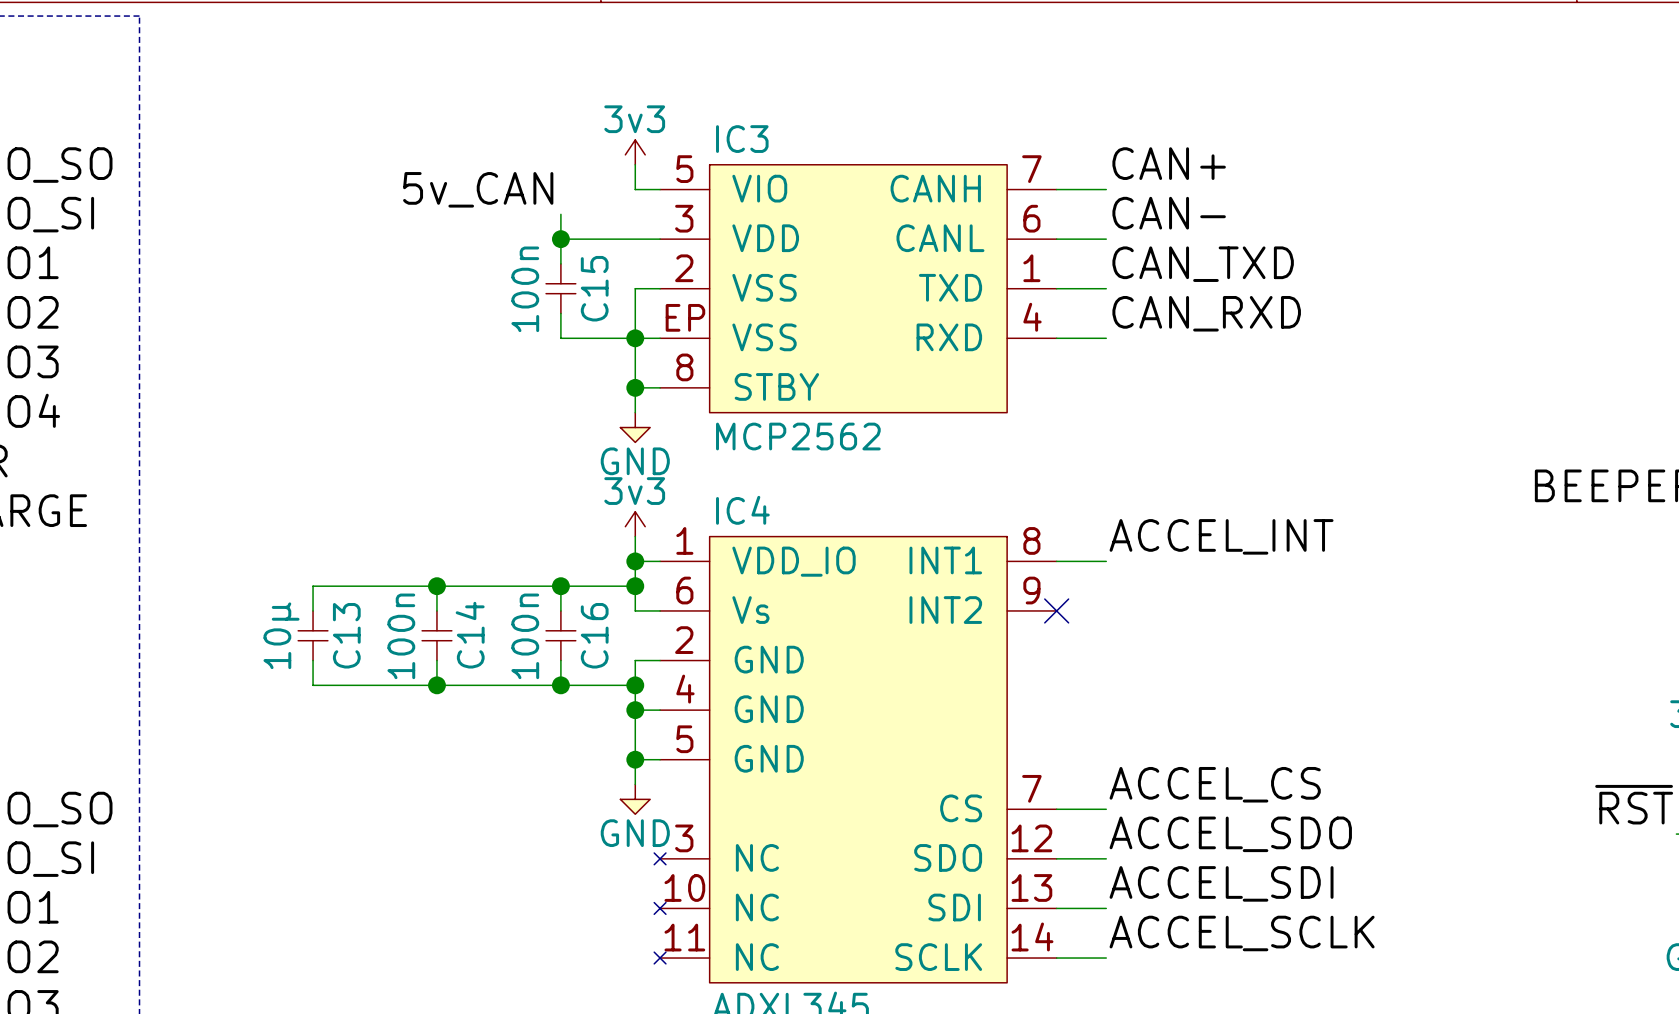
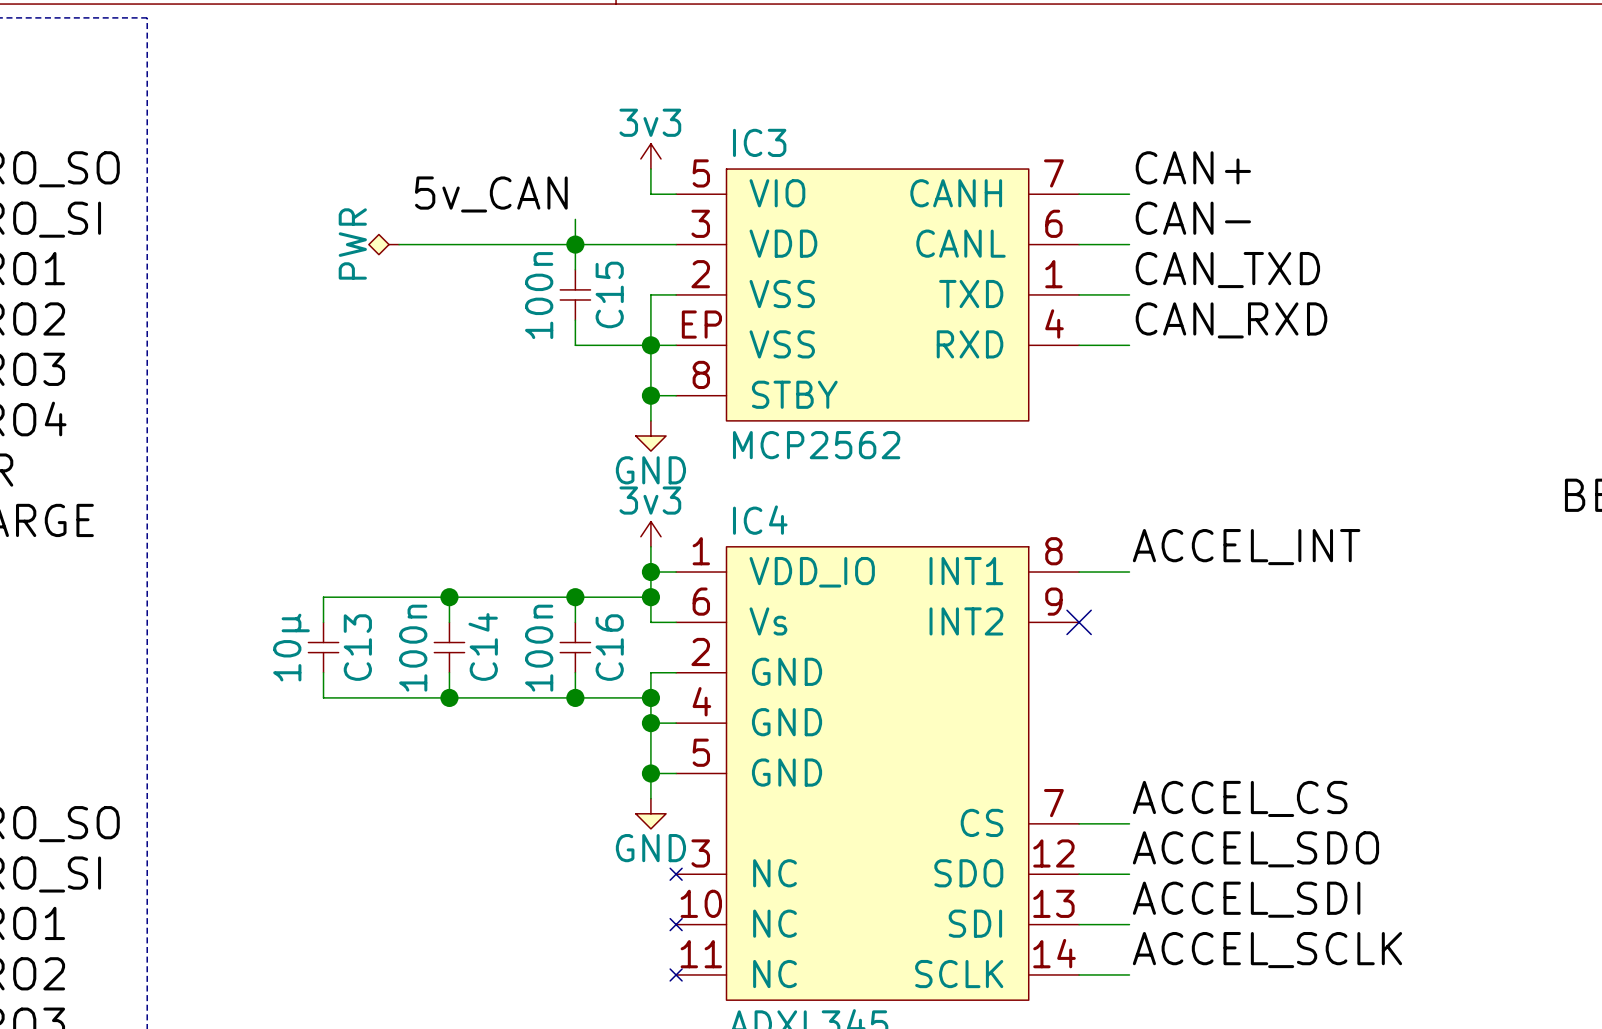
power symbol: none -> PWR (383, 244)
wire: none -> (399, 244) (575, 244)

